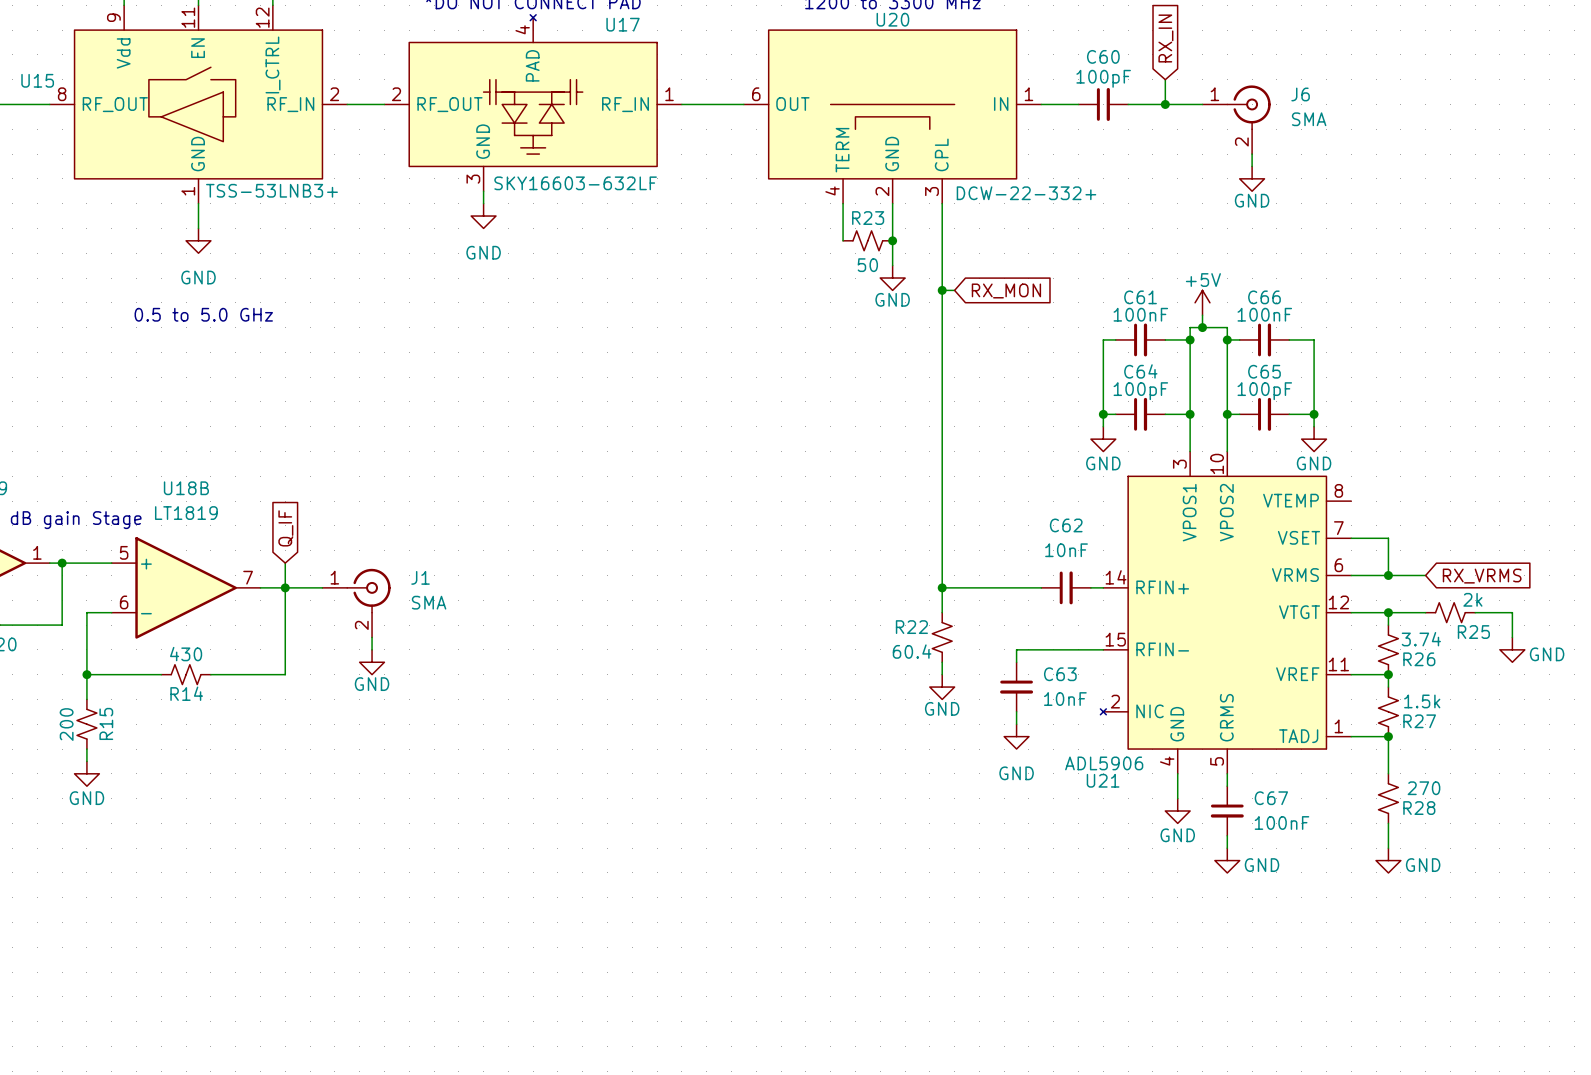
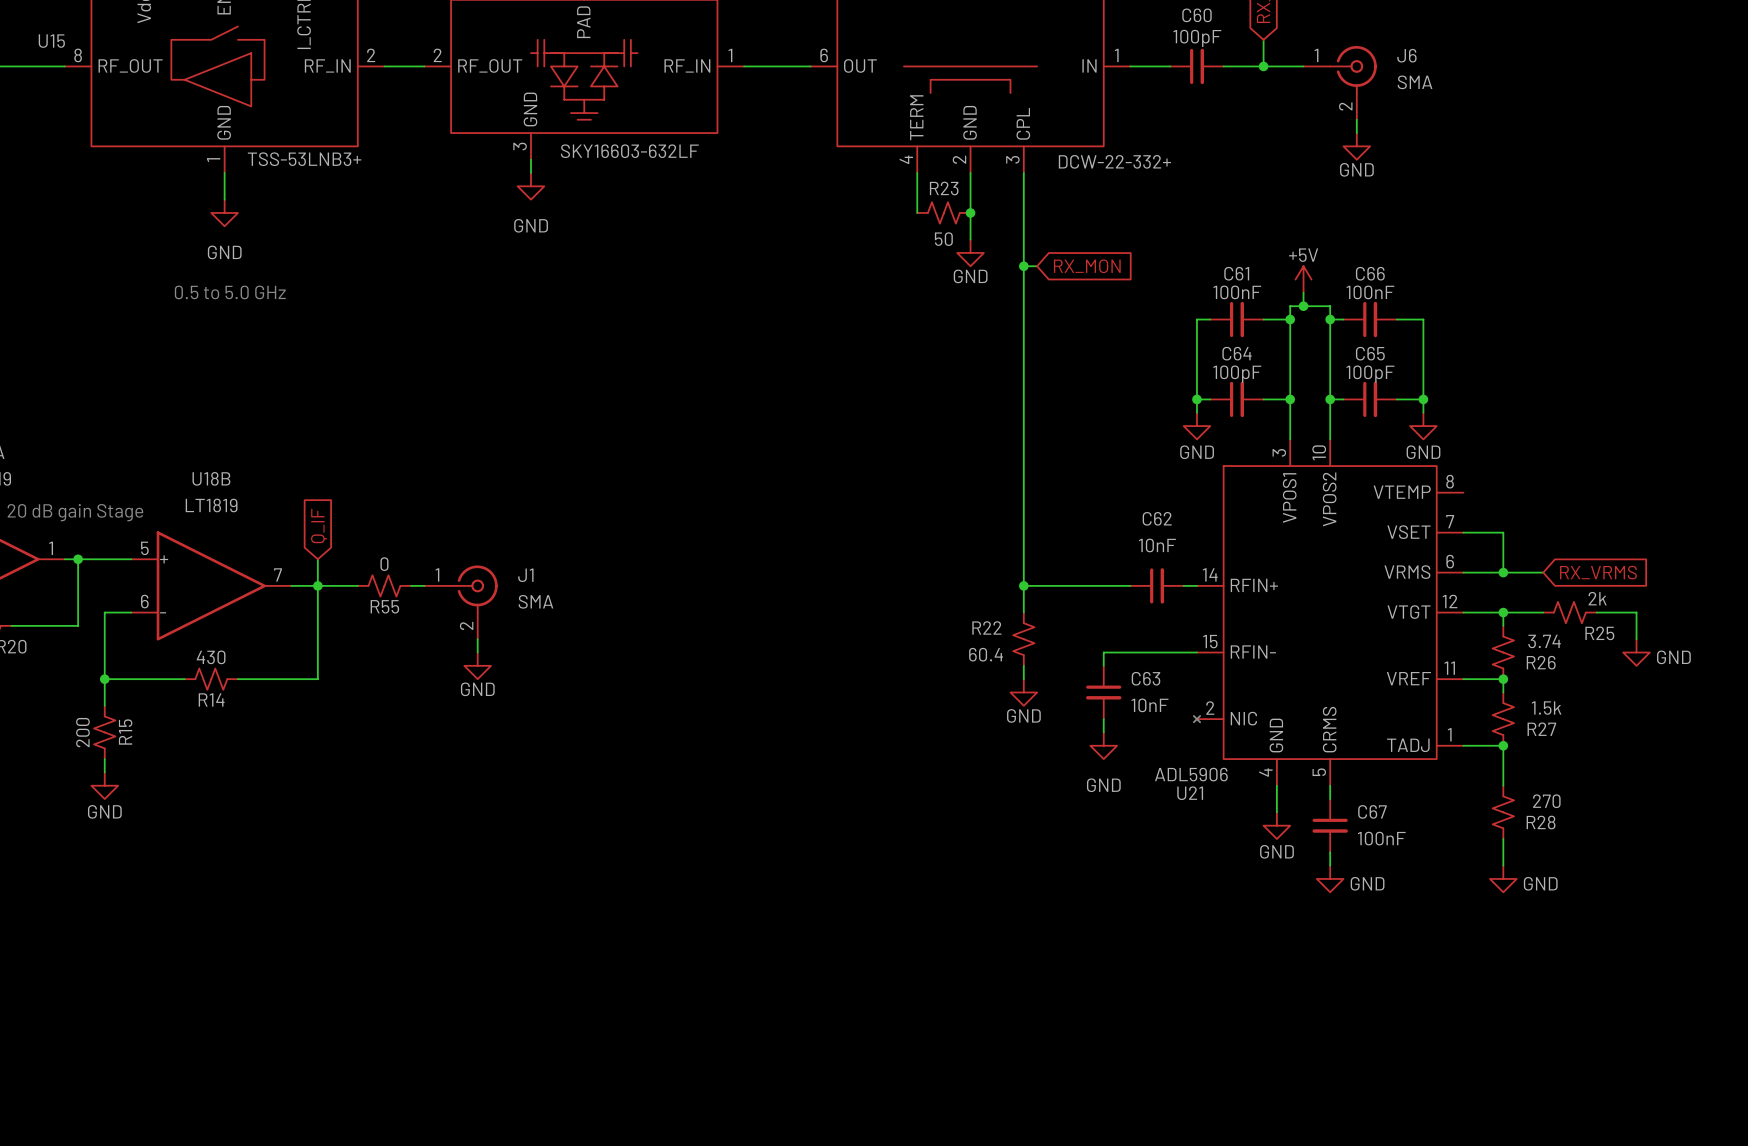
R55: none -> 0 (384, 585)
wire: none -> (411, 585) (424, 585)
J1 position: (356, 603) -> (461, 602)
wire: (372, 637) (372, 649) -> (477, 639) (477, 652)
power symbol position: GND (372, 662) -> GND (477, 665)

